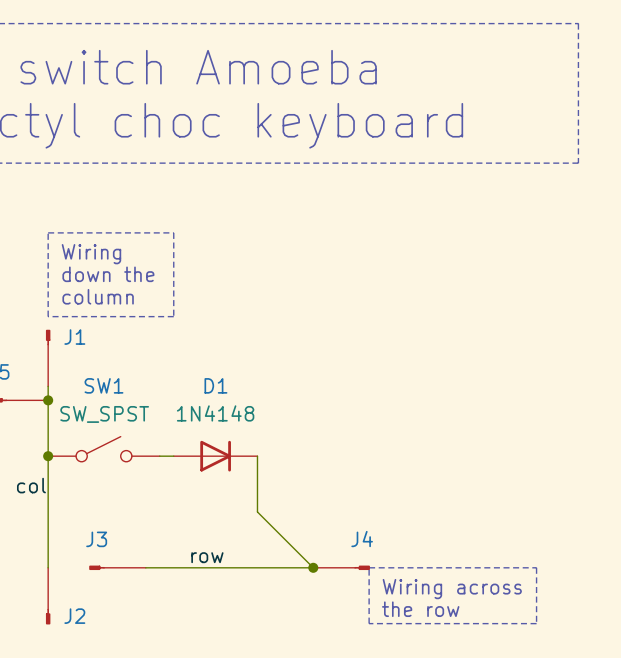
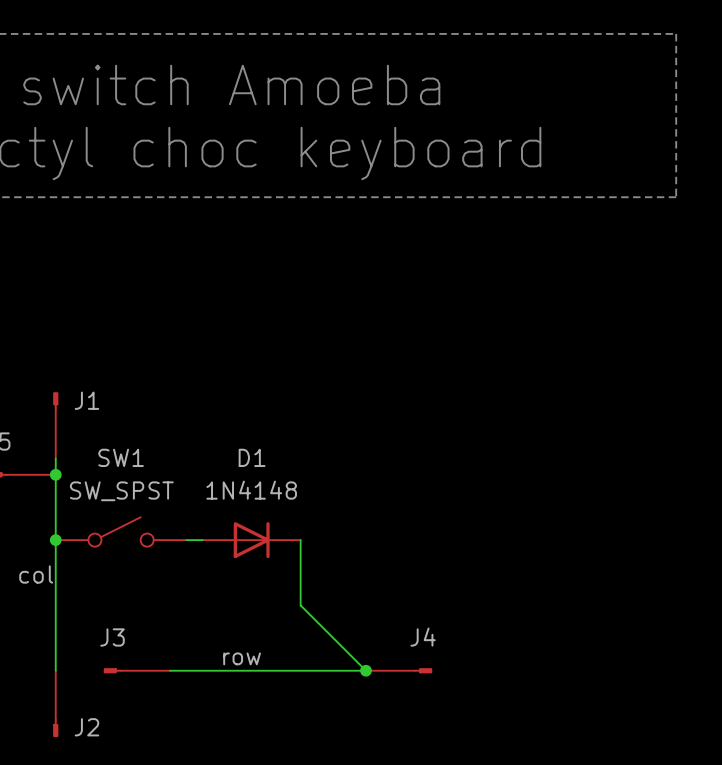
line: (48, 232) (173, 232) (173, 316) (48, 316) (48, 232) -> none
text: Wiring (91, 254) -> none
text: down the (108, 274) -> none
text: column (98, 296) -> none
line: (369, 567) (536, 567) (536, 623) (369, 623) (369, 567) -> none
text: Wiring across (452, 589) -> none
text: the row (420, 609) -> none

